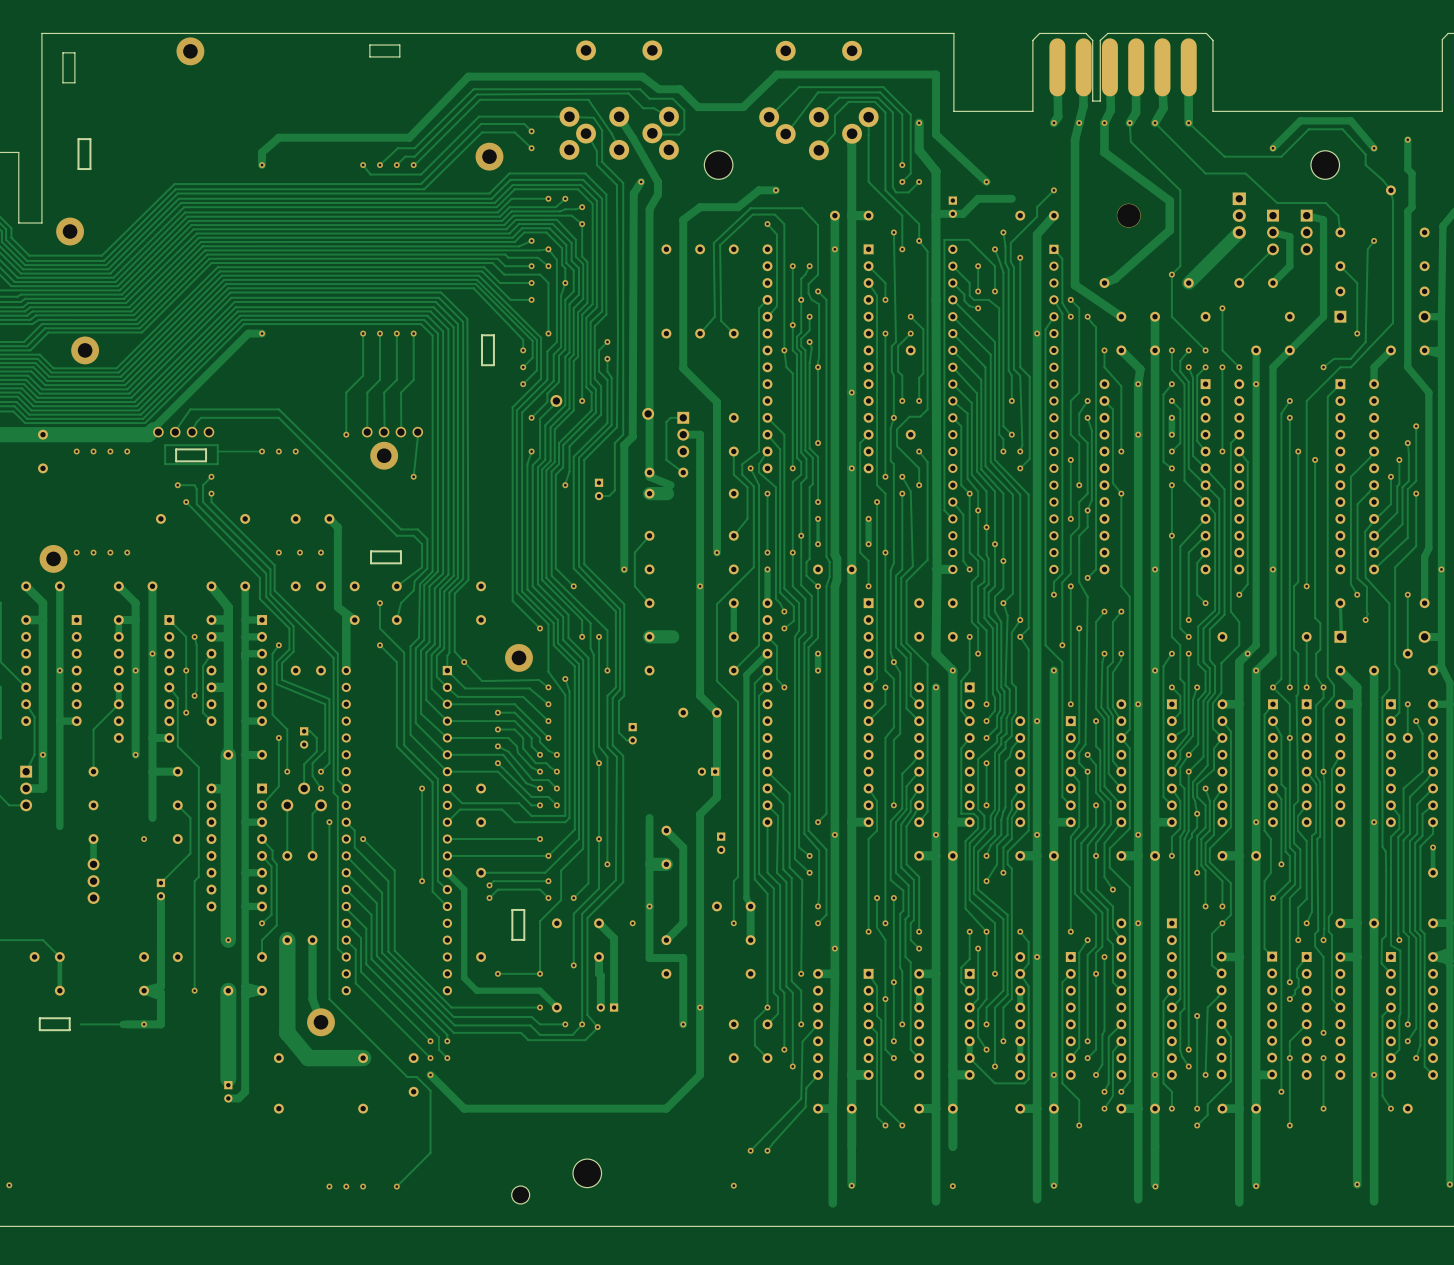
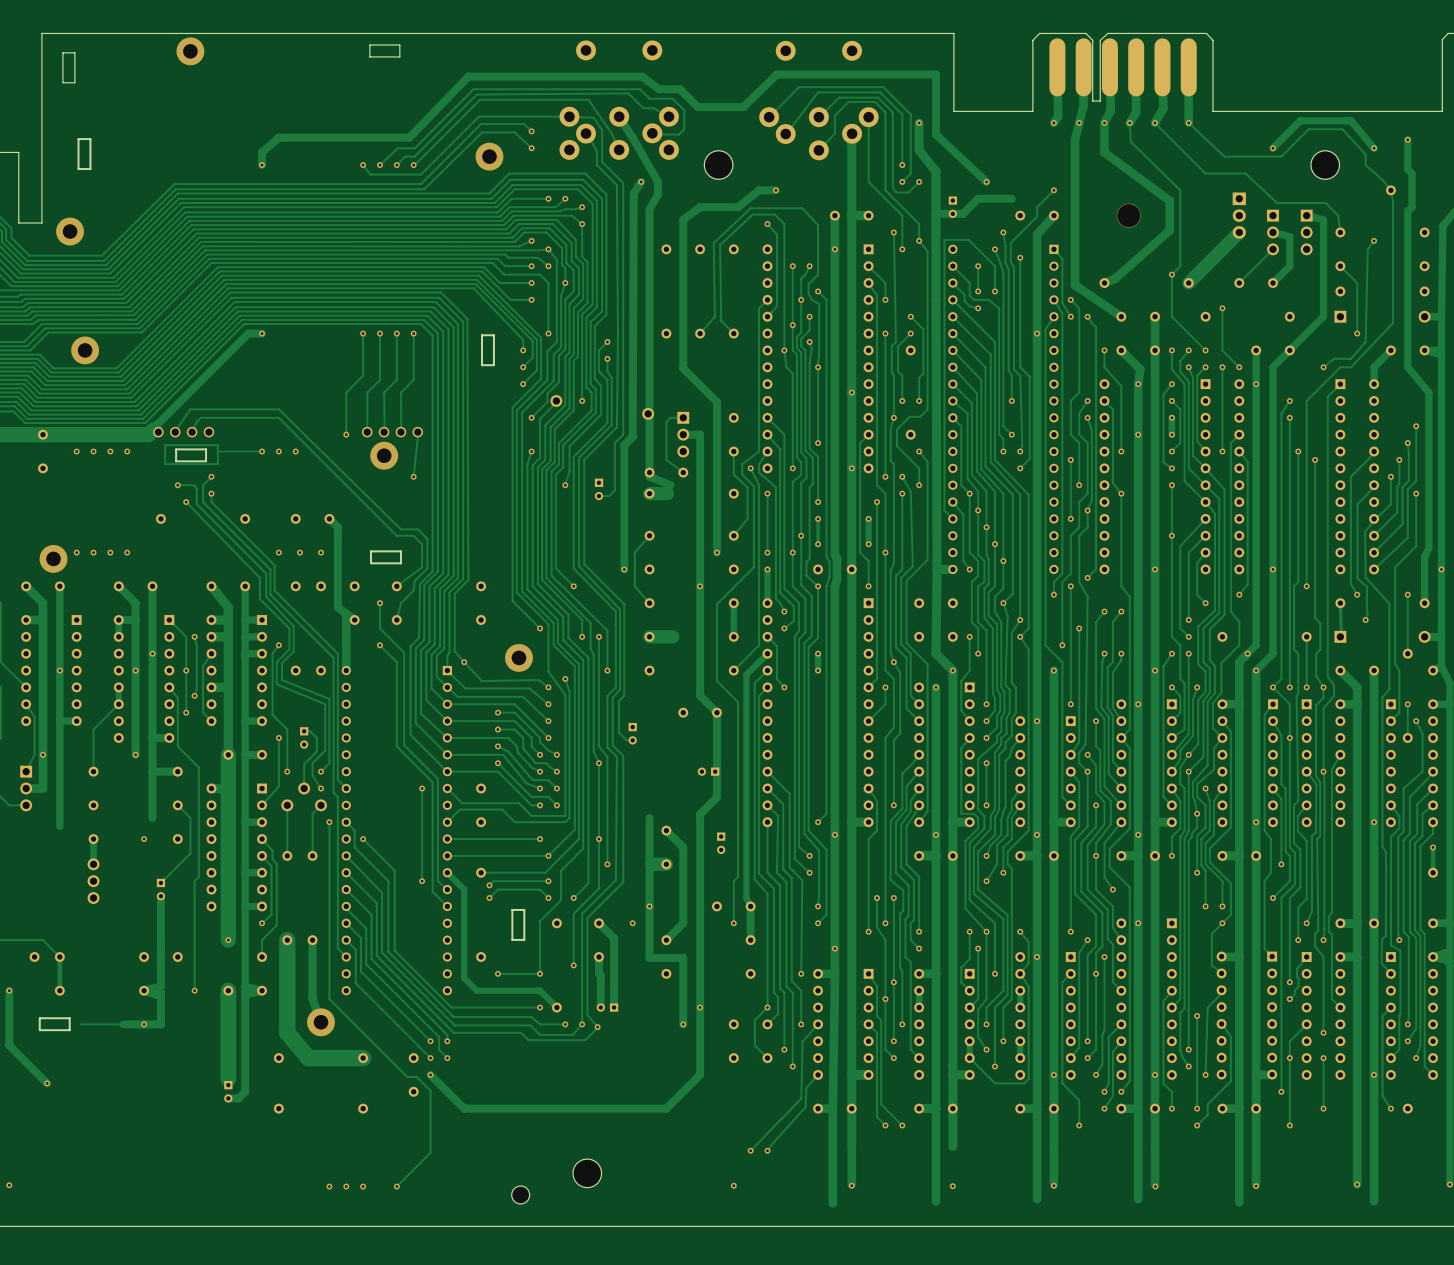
track: none -> (9, 990) (9, 1045) (47, 1083)
via: none -> (9, 990)
via: none -> (47, 1083)

